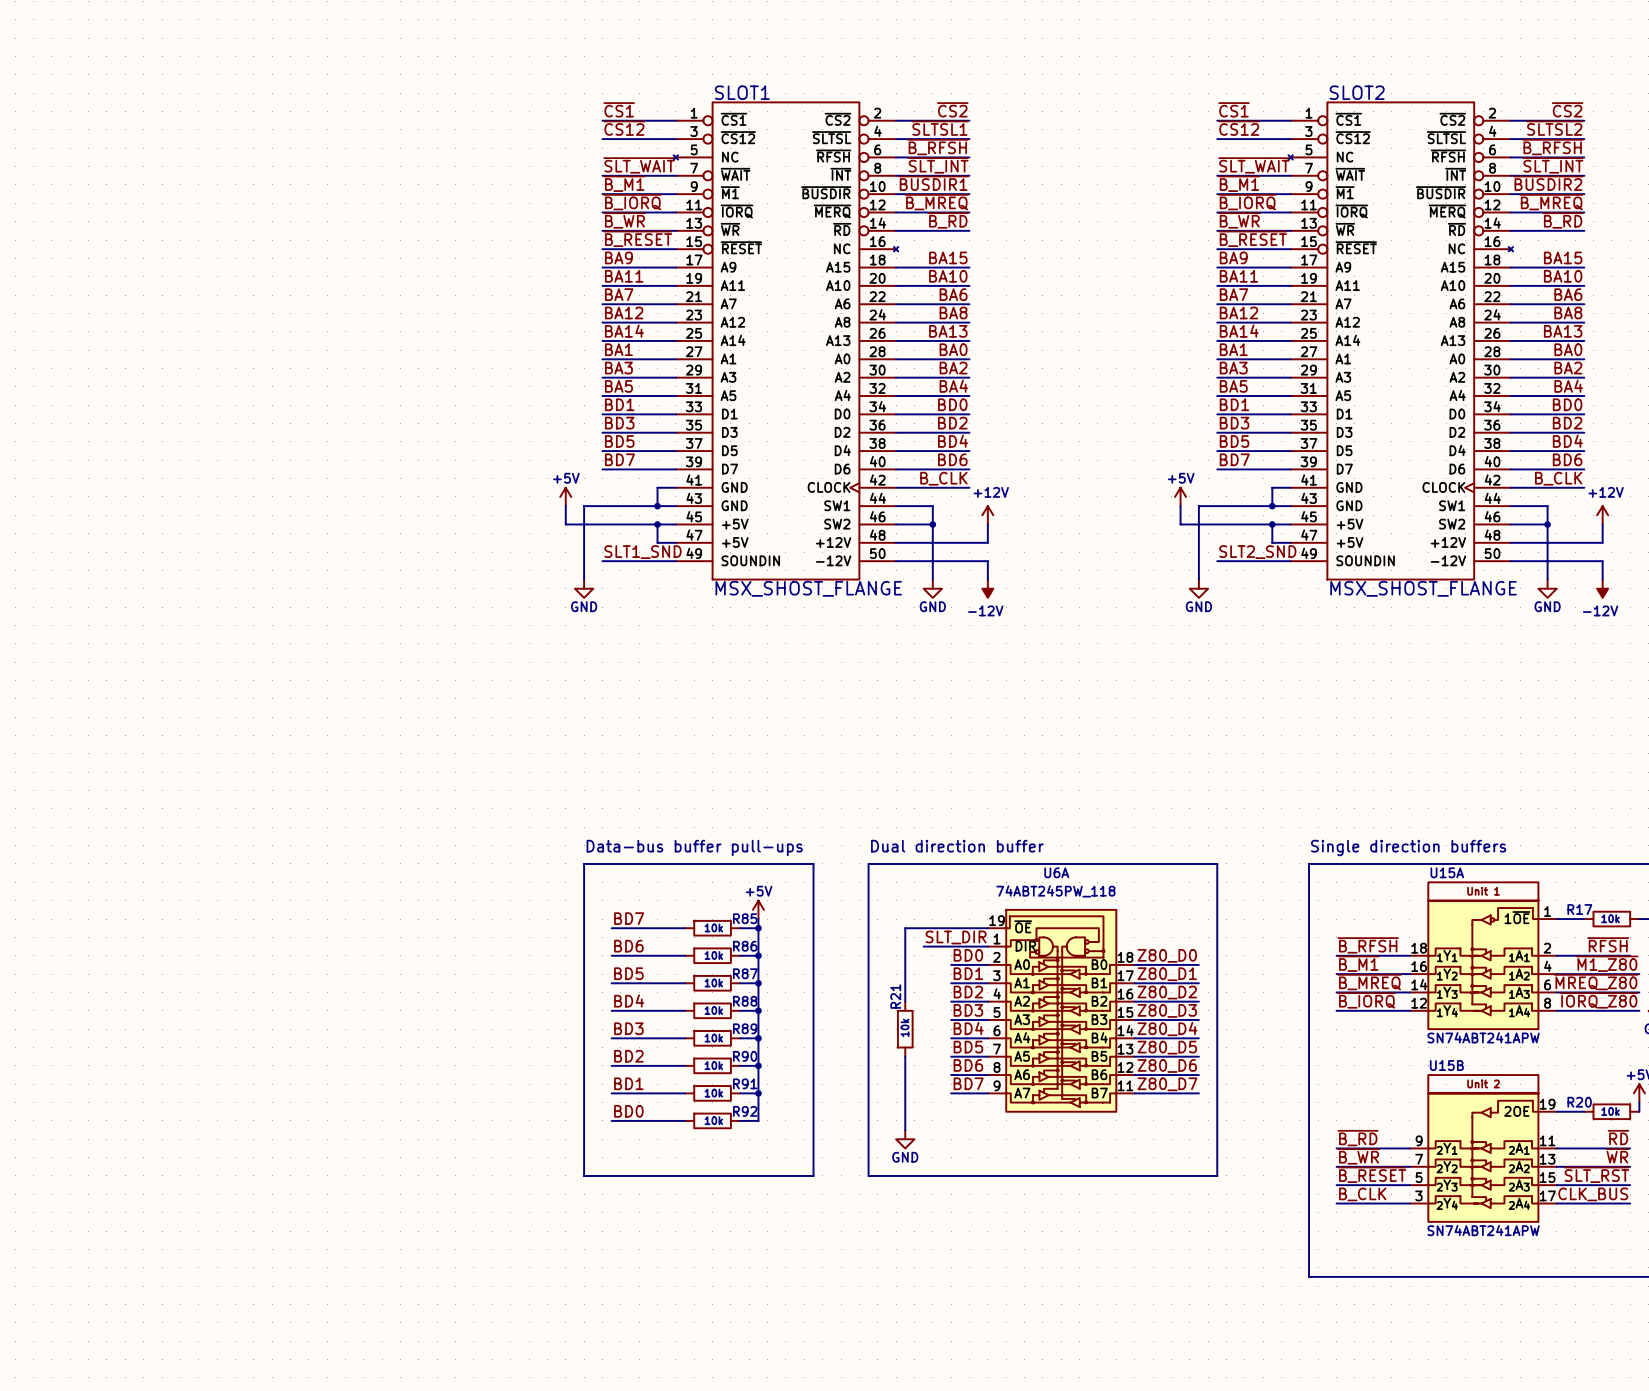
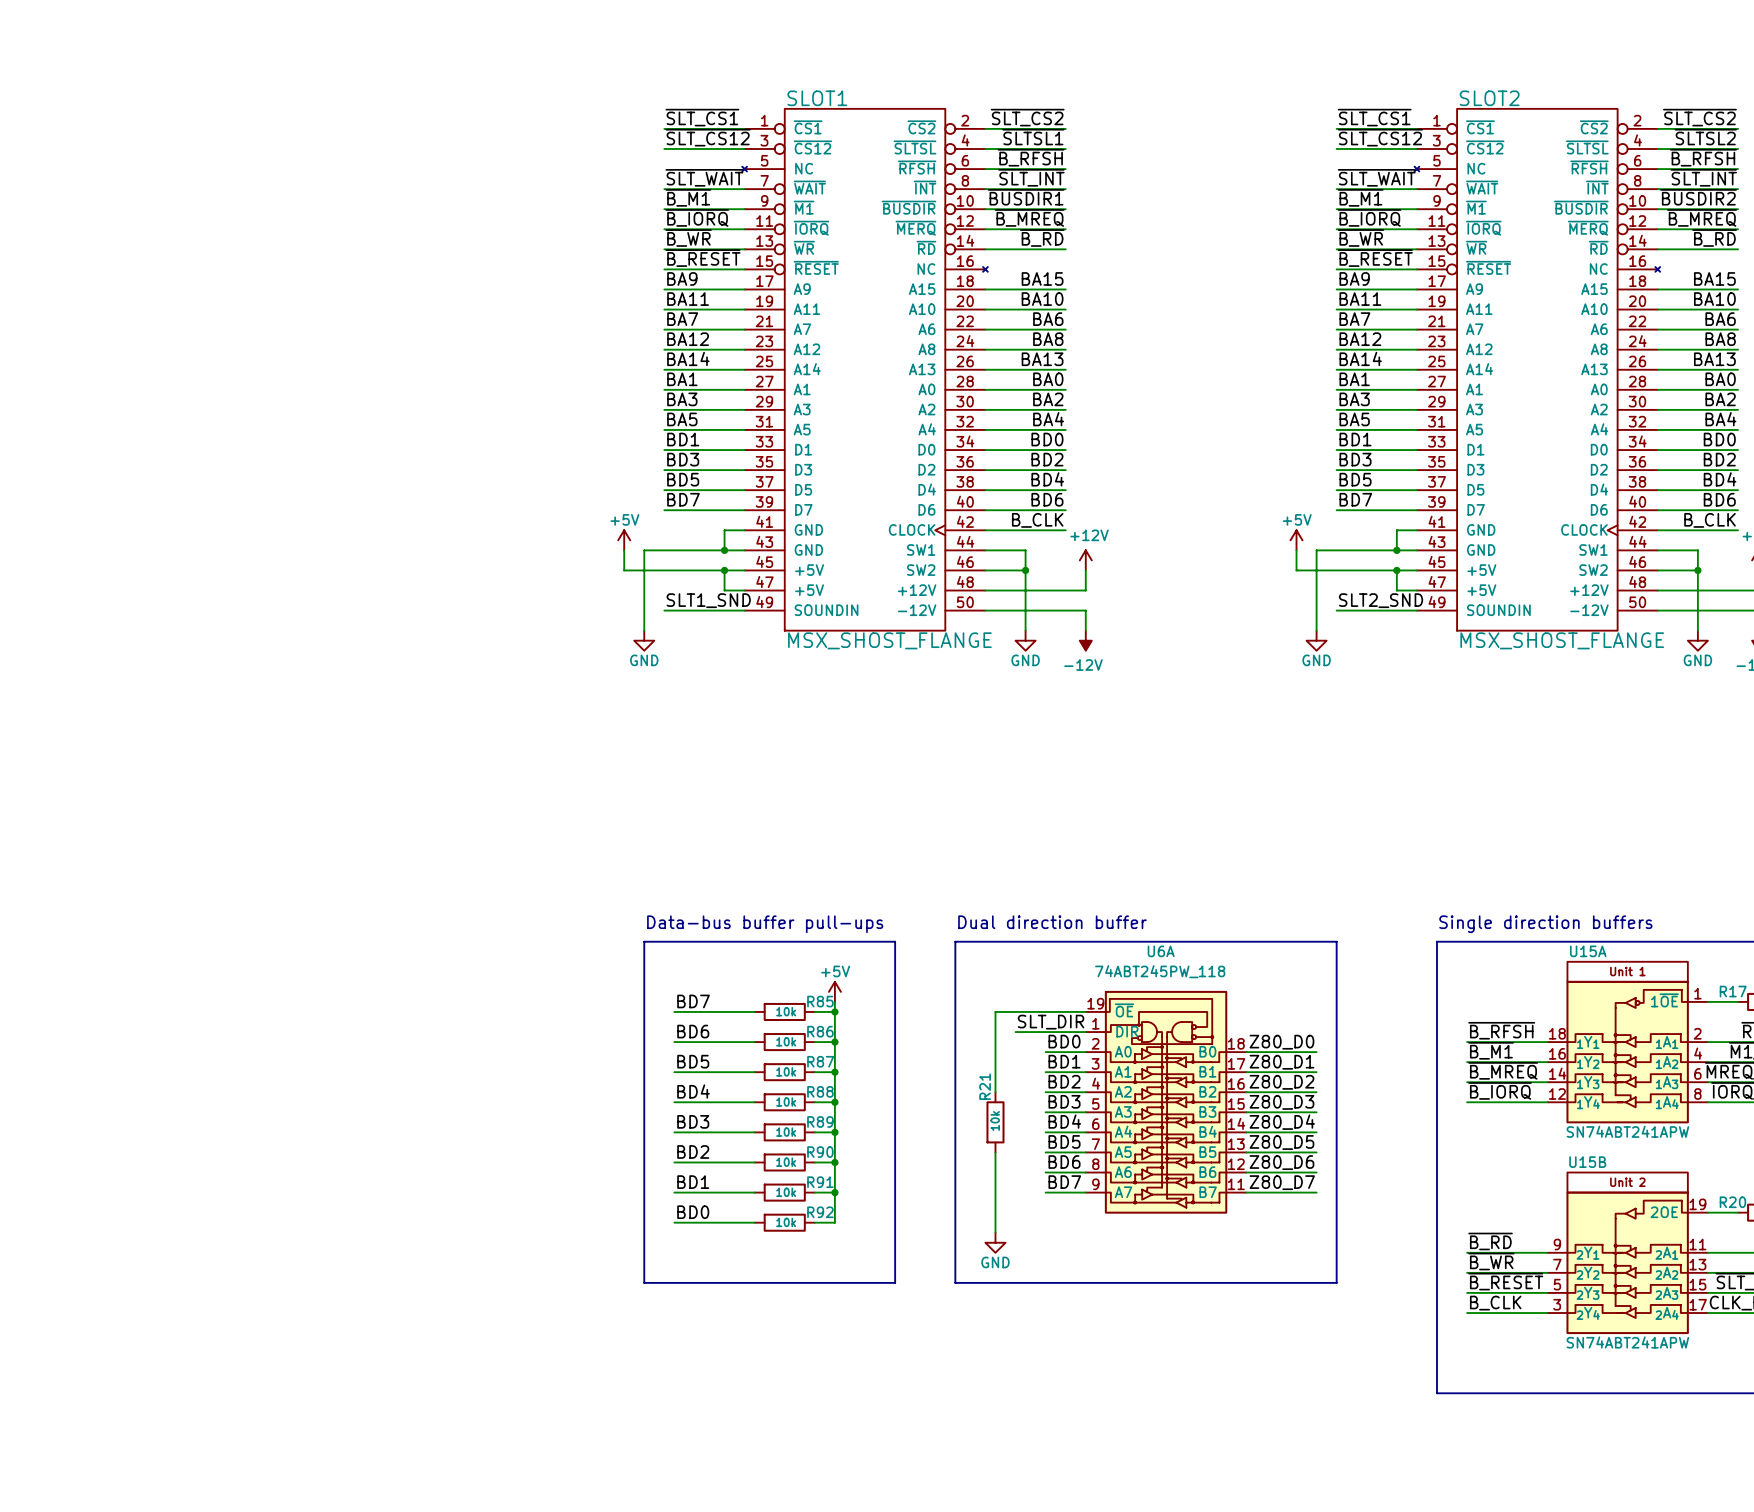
label: ~{CS1} (619, 109) -> ~{SLT_CS1} (702, 117)
label: ~{CS2} (952, 109) -> ~{SLT_CS2} (1027, 117)
label: ~{CS1} (1233, 109) -> ~{SLT_CS1} (1374, 117)
label: ~{CS2} (1567, 109) -> ~{SLT_CS2} (1699, 117)
label: ~{CS12} (624, 128) -> ~{SLT_CS12} (708, 137)
label: ~{CS12} (1239, 128) -> ~{SLT_CS12} (1380, 137)

